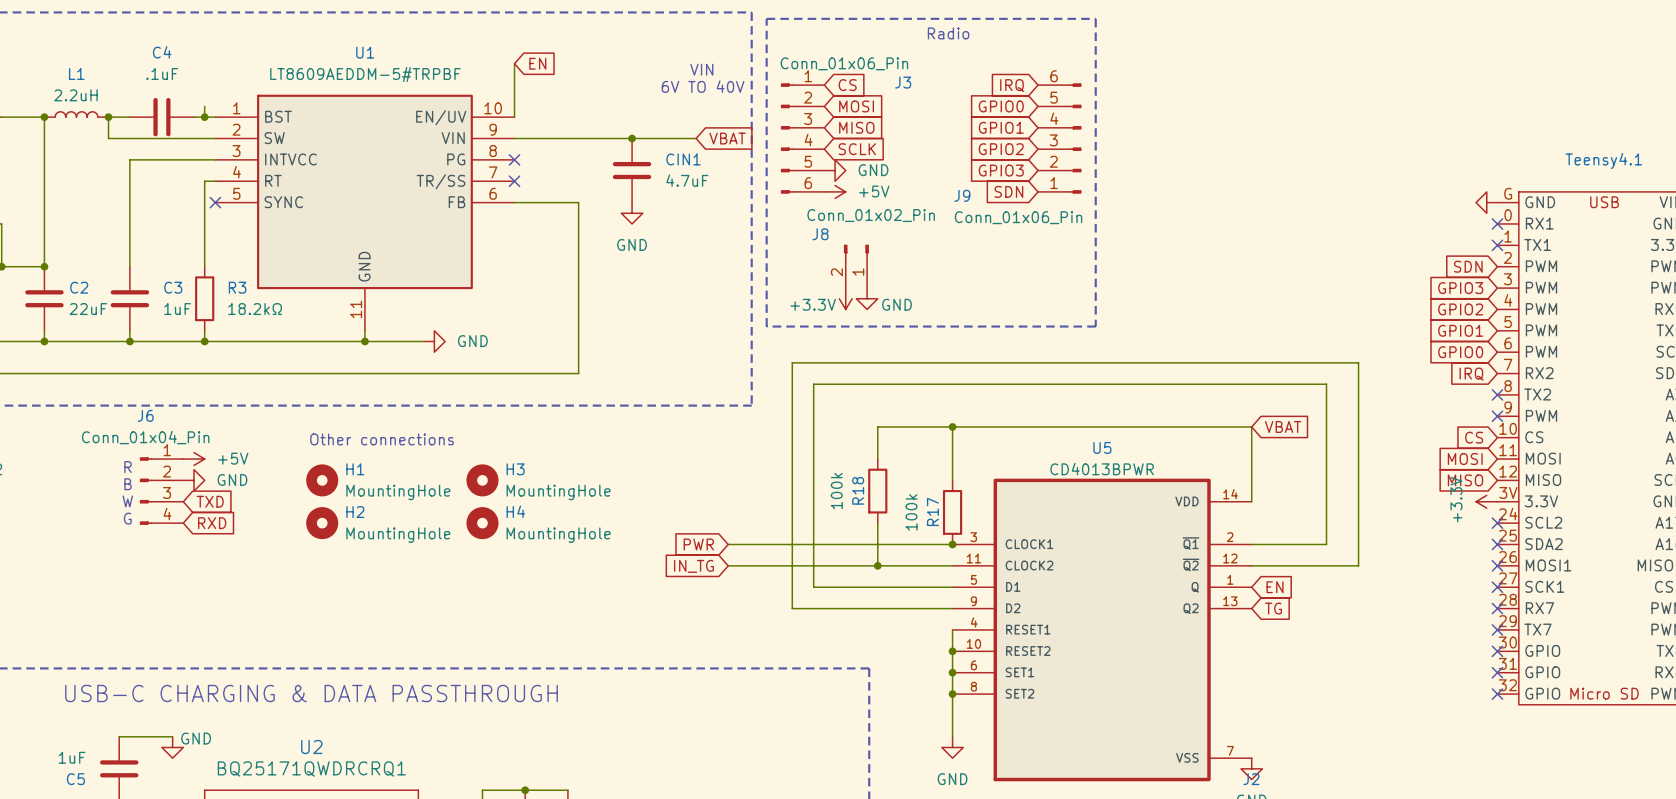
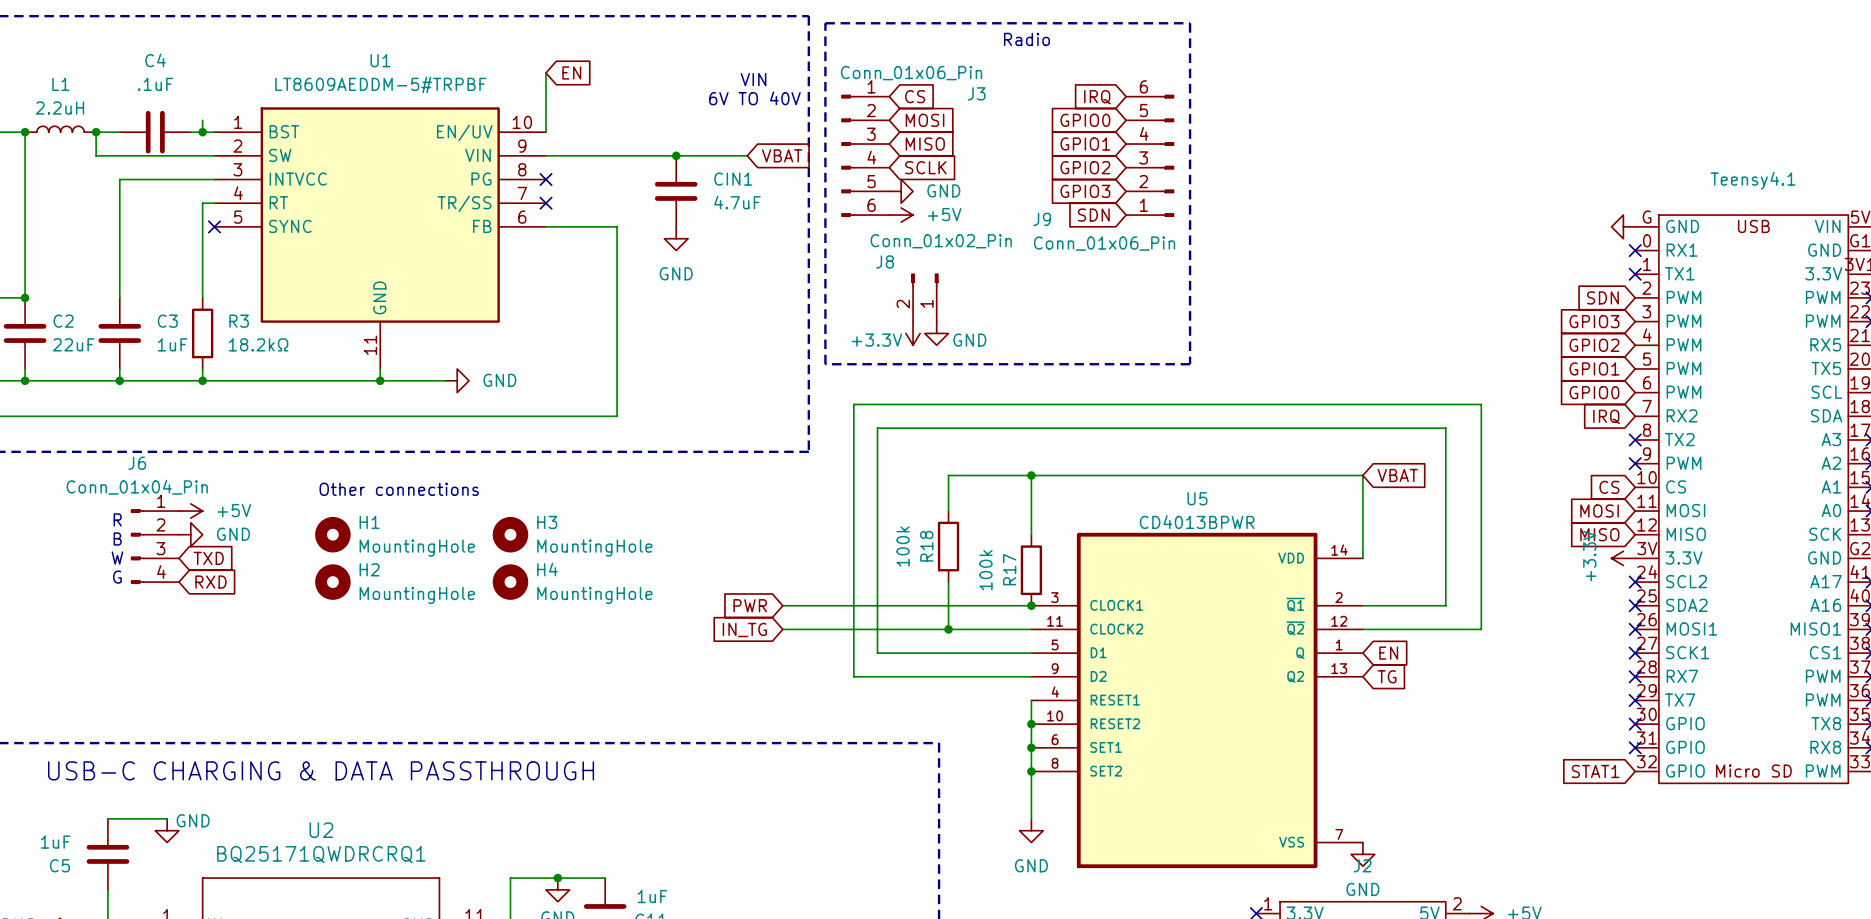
global label: none -> STAT1 (1595, 771)
no-connect mark: (1497, 694) -> none

